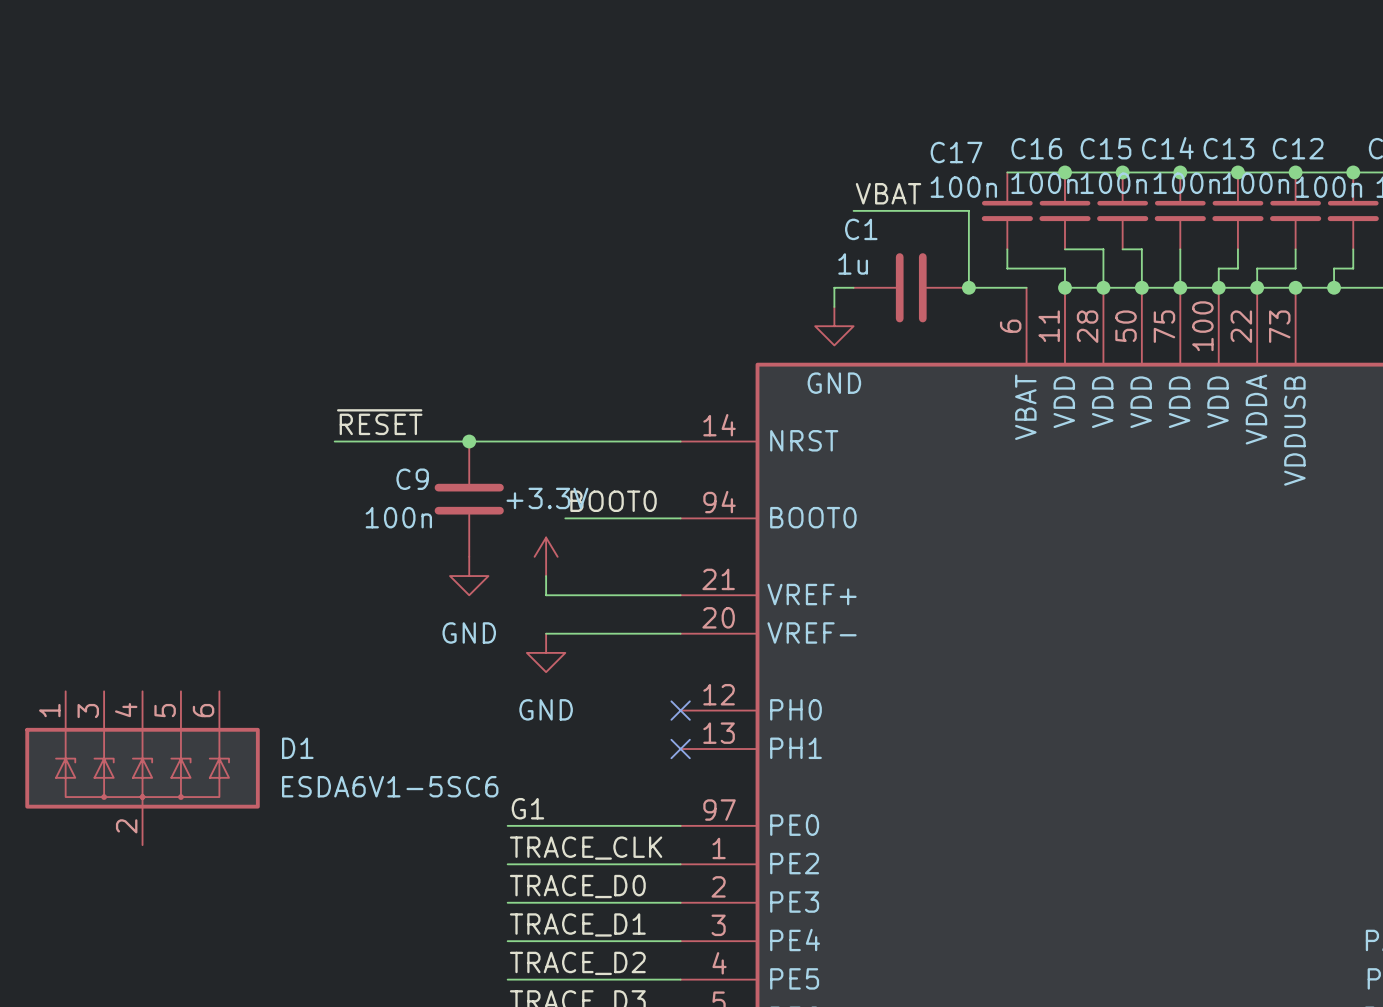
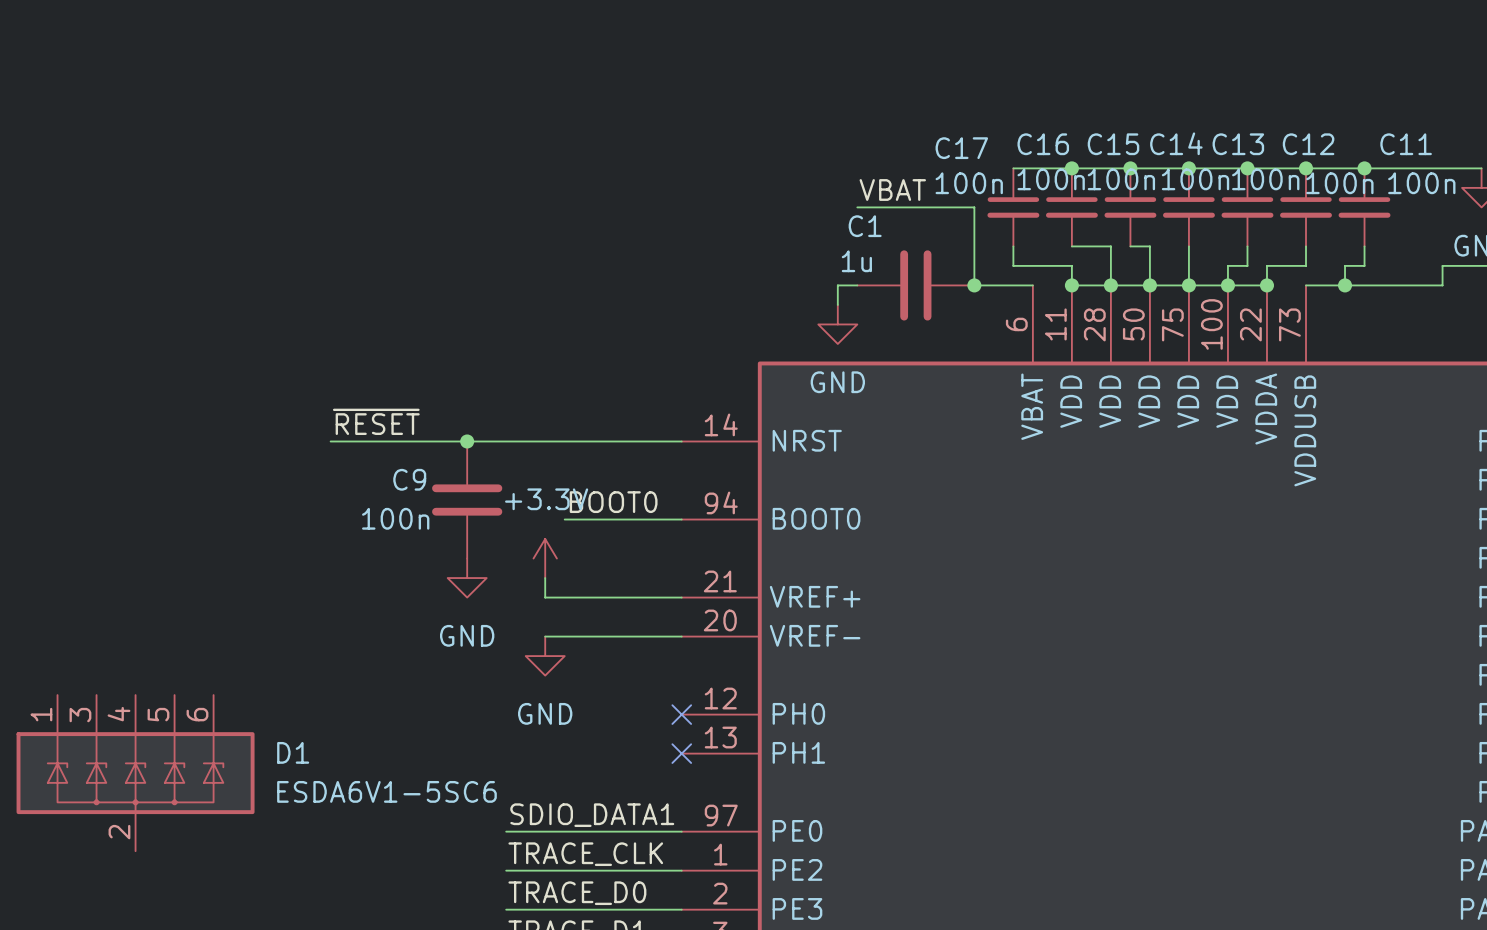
wire: (1257, 287) (1295, 287) -> none
junction: (1295, 287) -> none
label: G1 (527, 808) -> SDIO_DATA1 (592, 815)

